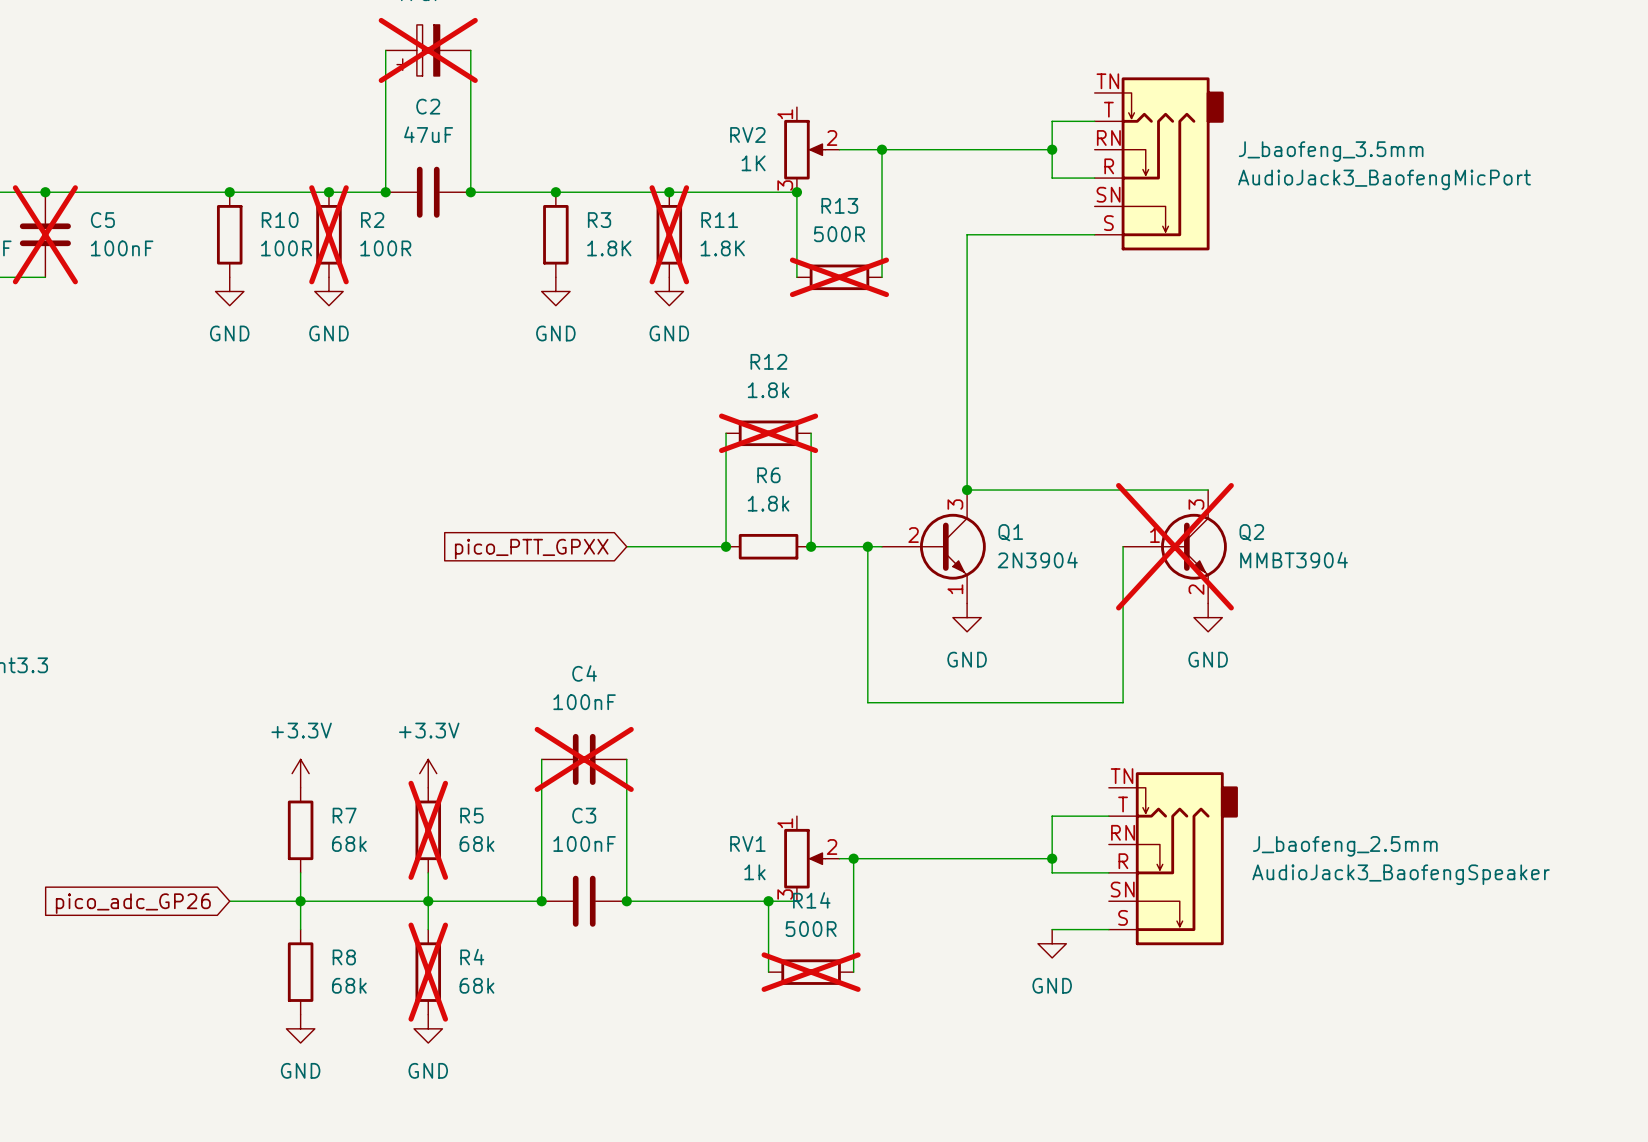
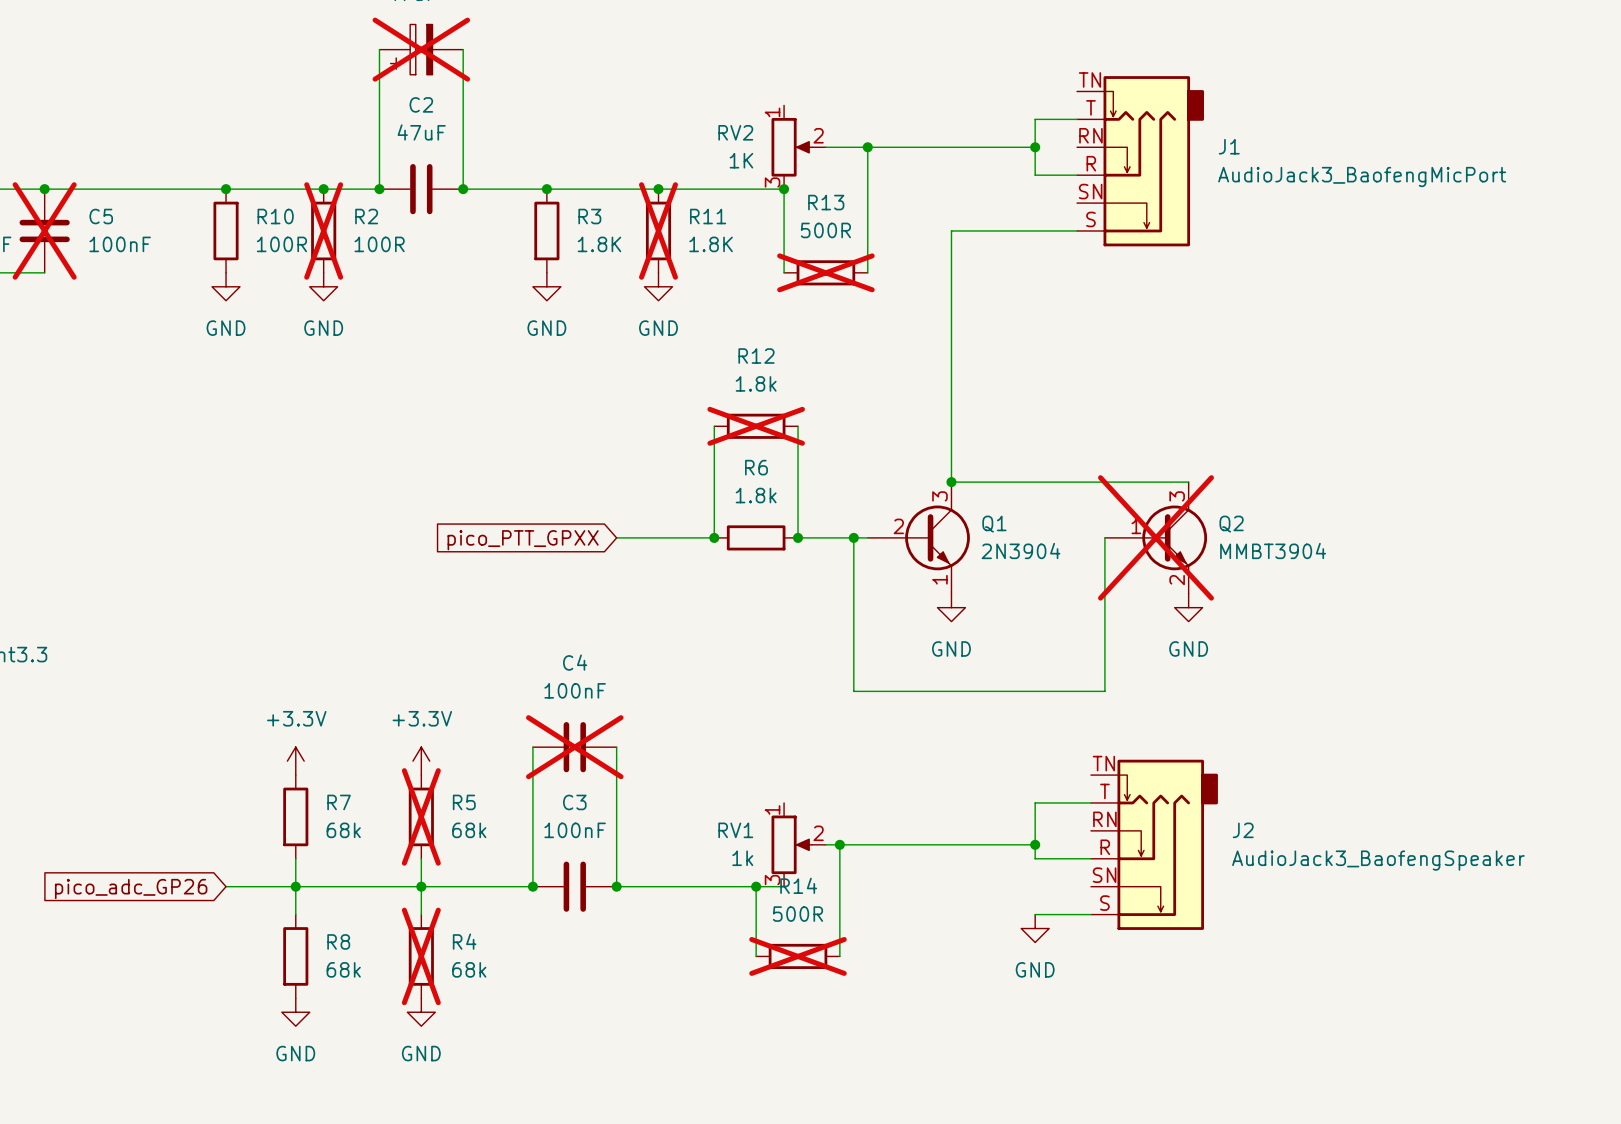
J_baofeng_3.5mm name: J_baofeng_3.5mm (1331, 151) -> J1 (1229, 146)
J_baofeng_2.5mm name: J_baofeng_2.5mm (1345, 846) -> J2 (1243, 830)

